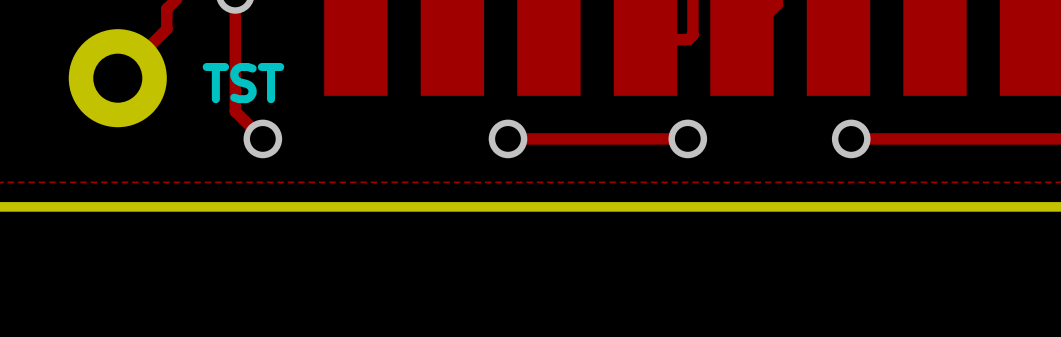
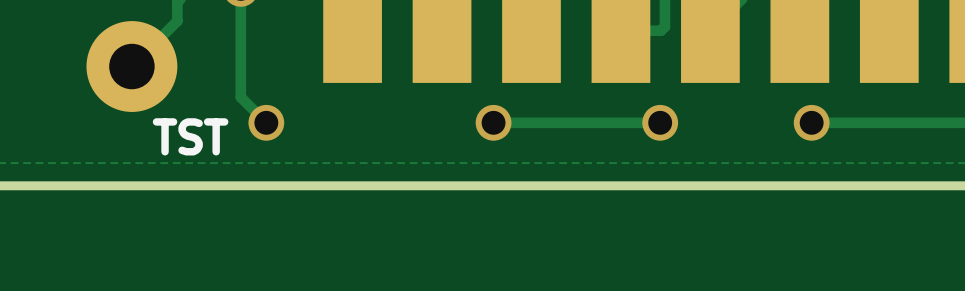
text position: TST (243, 83) -> TST (190, 136)

